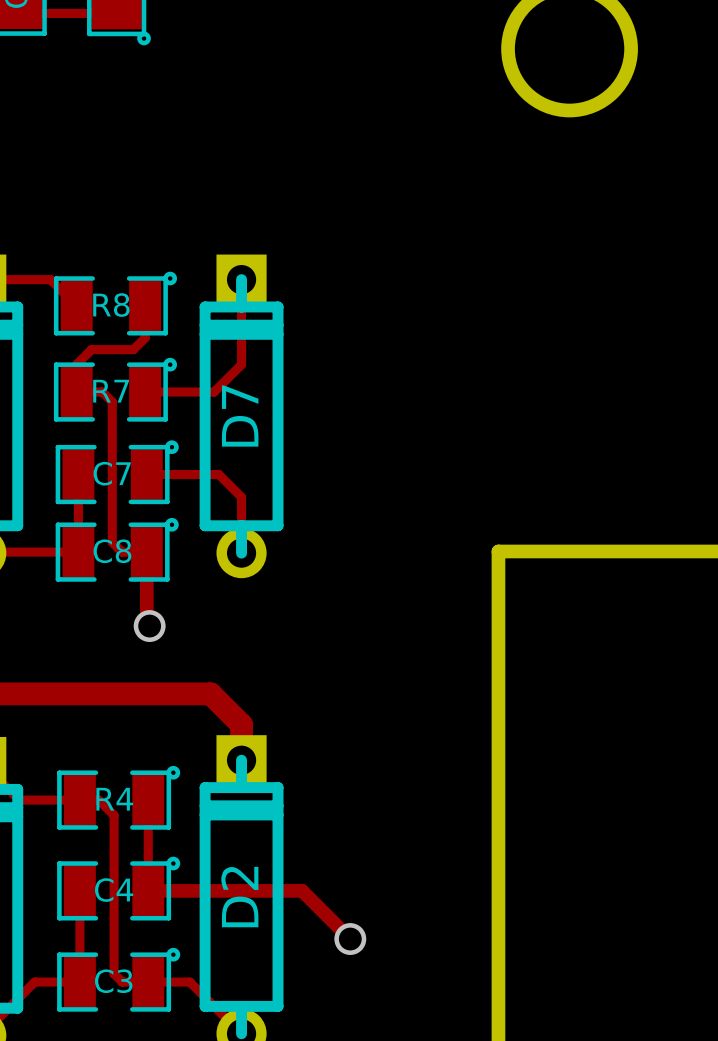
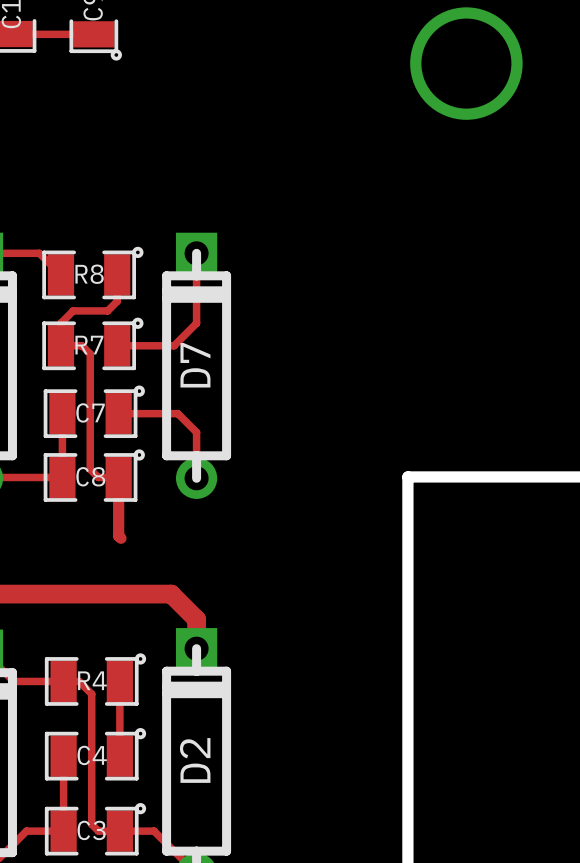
via: (149, 626) -> none
track: (148, 890) (302, 890) (350, 939) -> none
via: (350, 939) -> none

